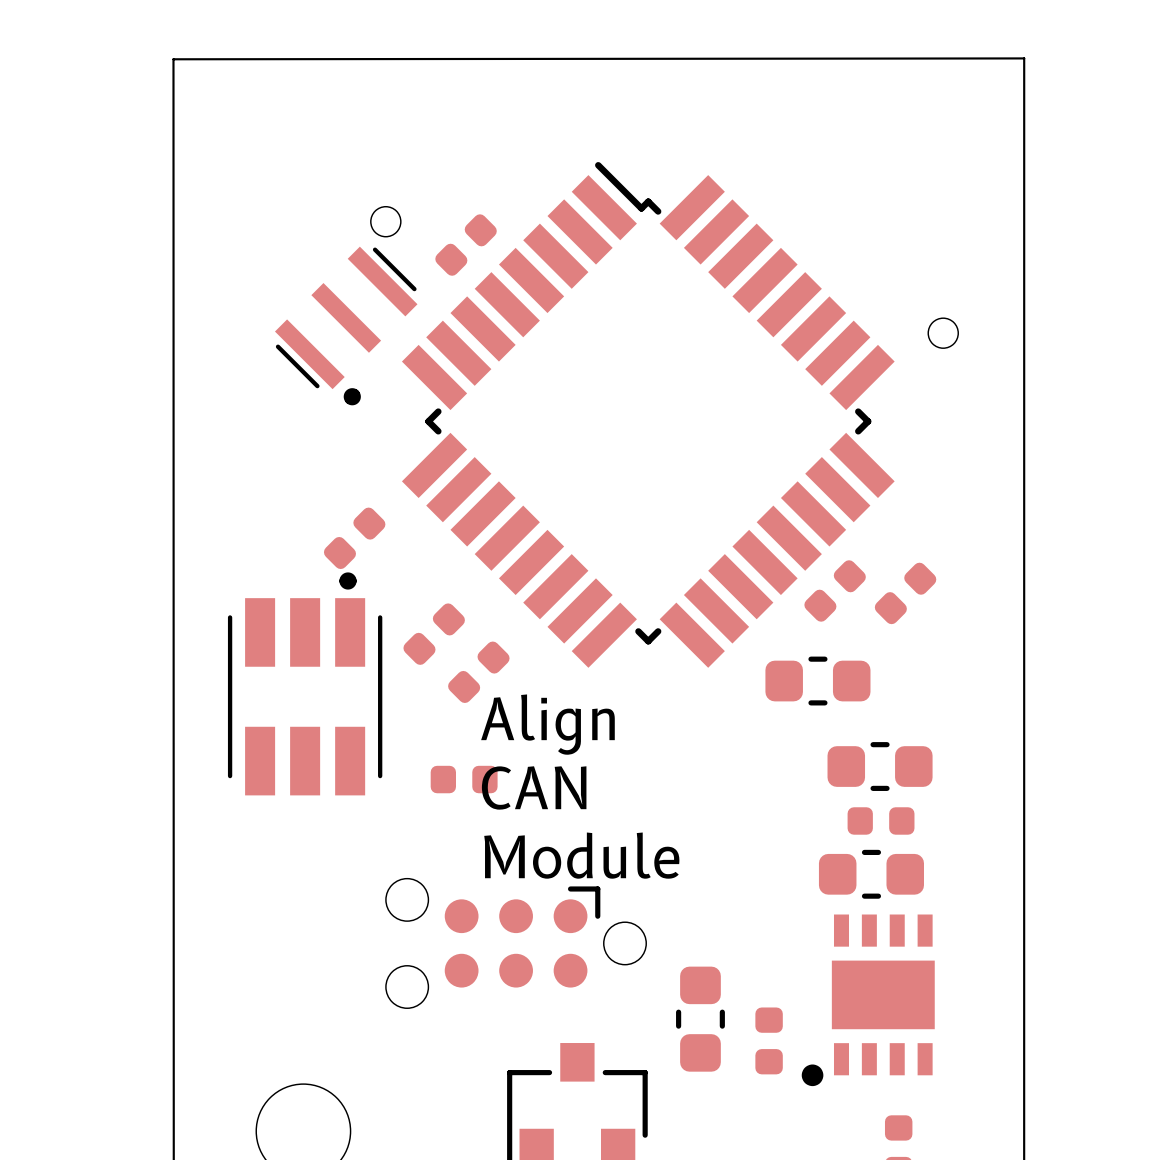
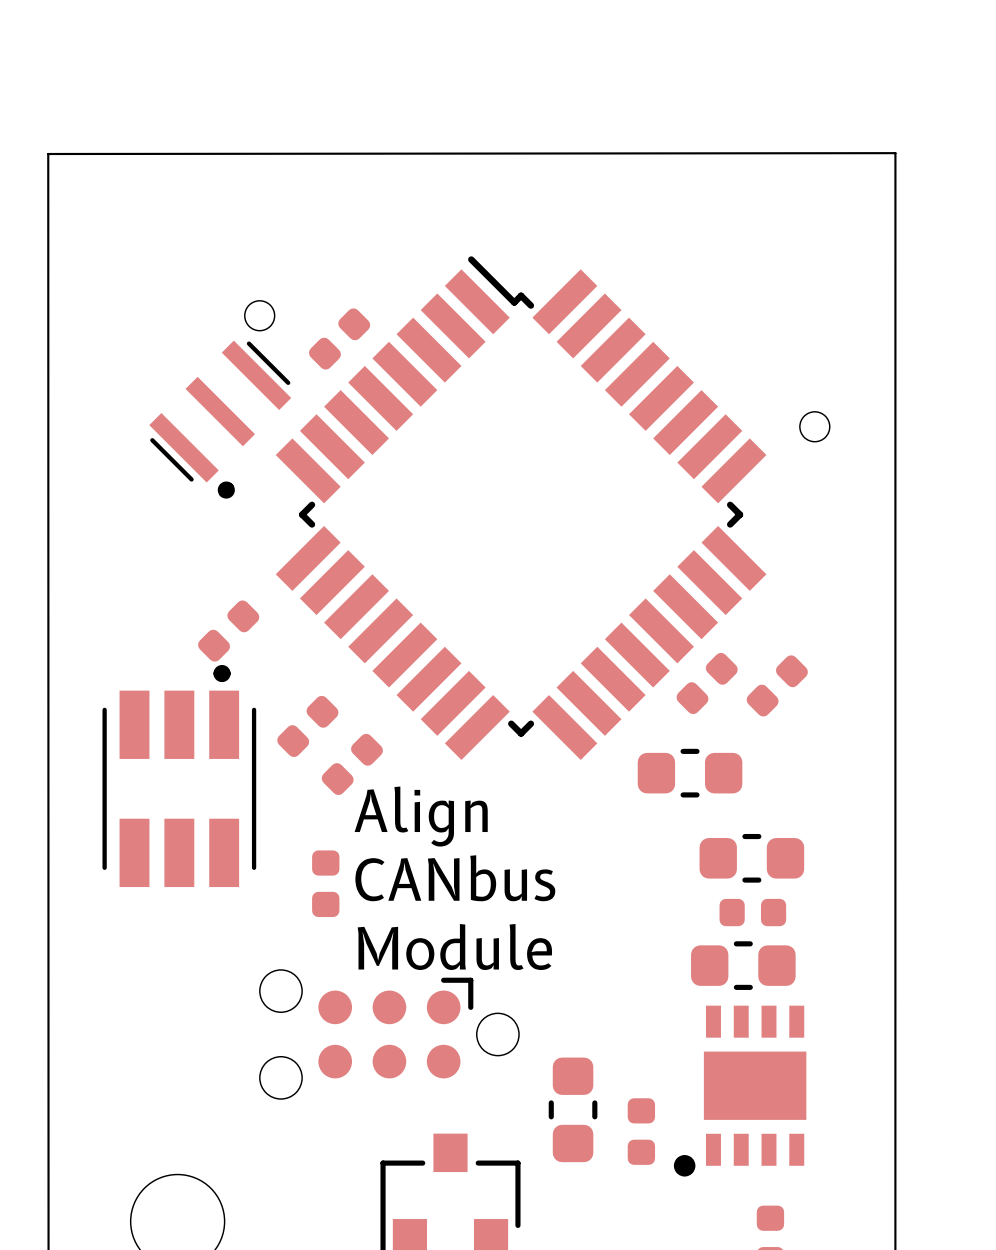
part rotation: 0° (464, 779) -> 90° clockwise (325, 883)
text: CAN (534, 787) -> CANbus (455, 878)

